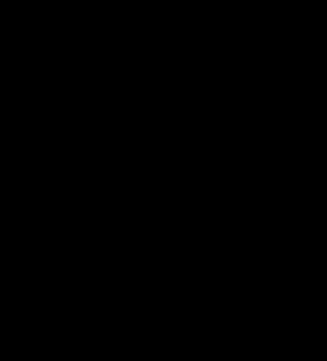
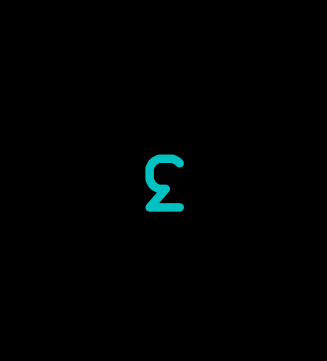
text: none -> 3 (164, 183)

